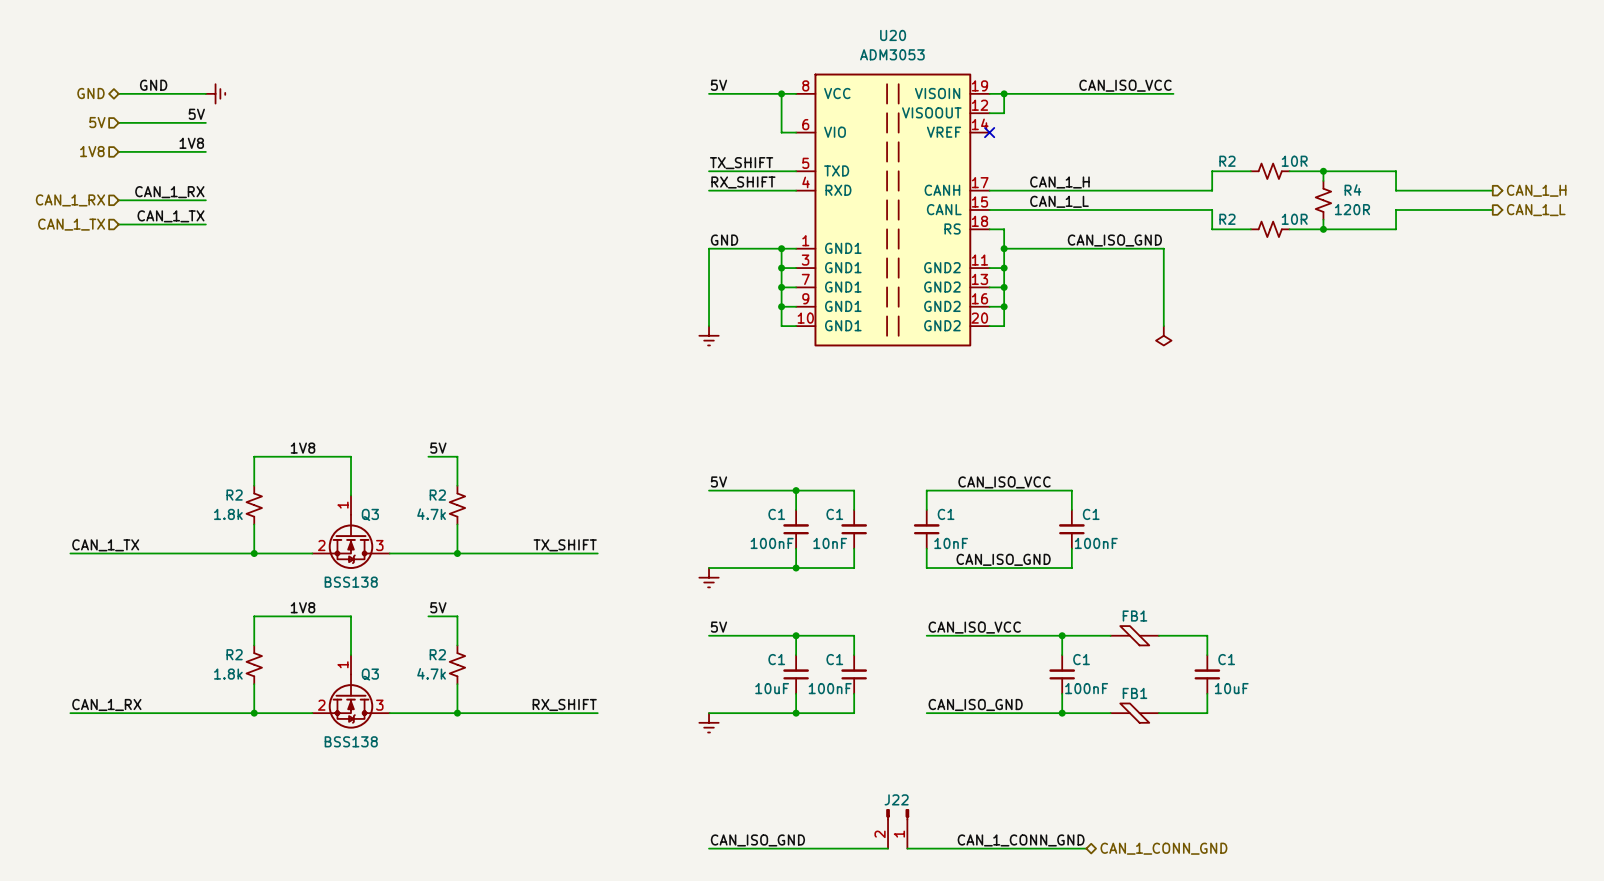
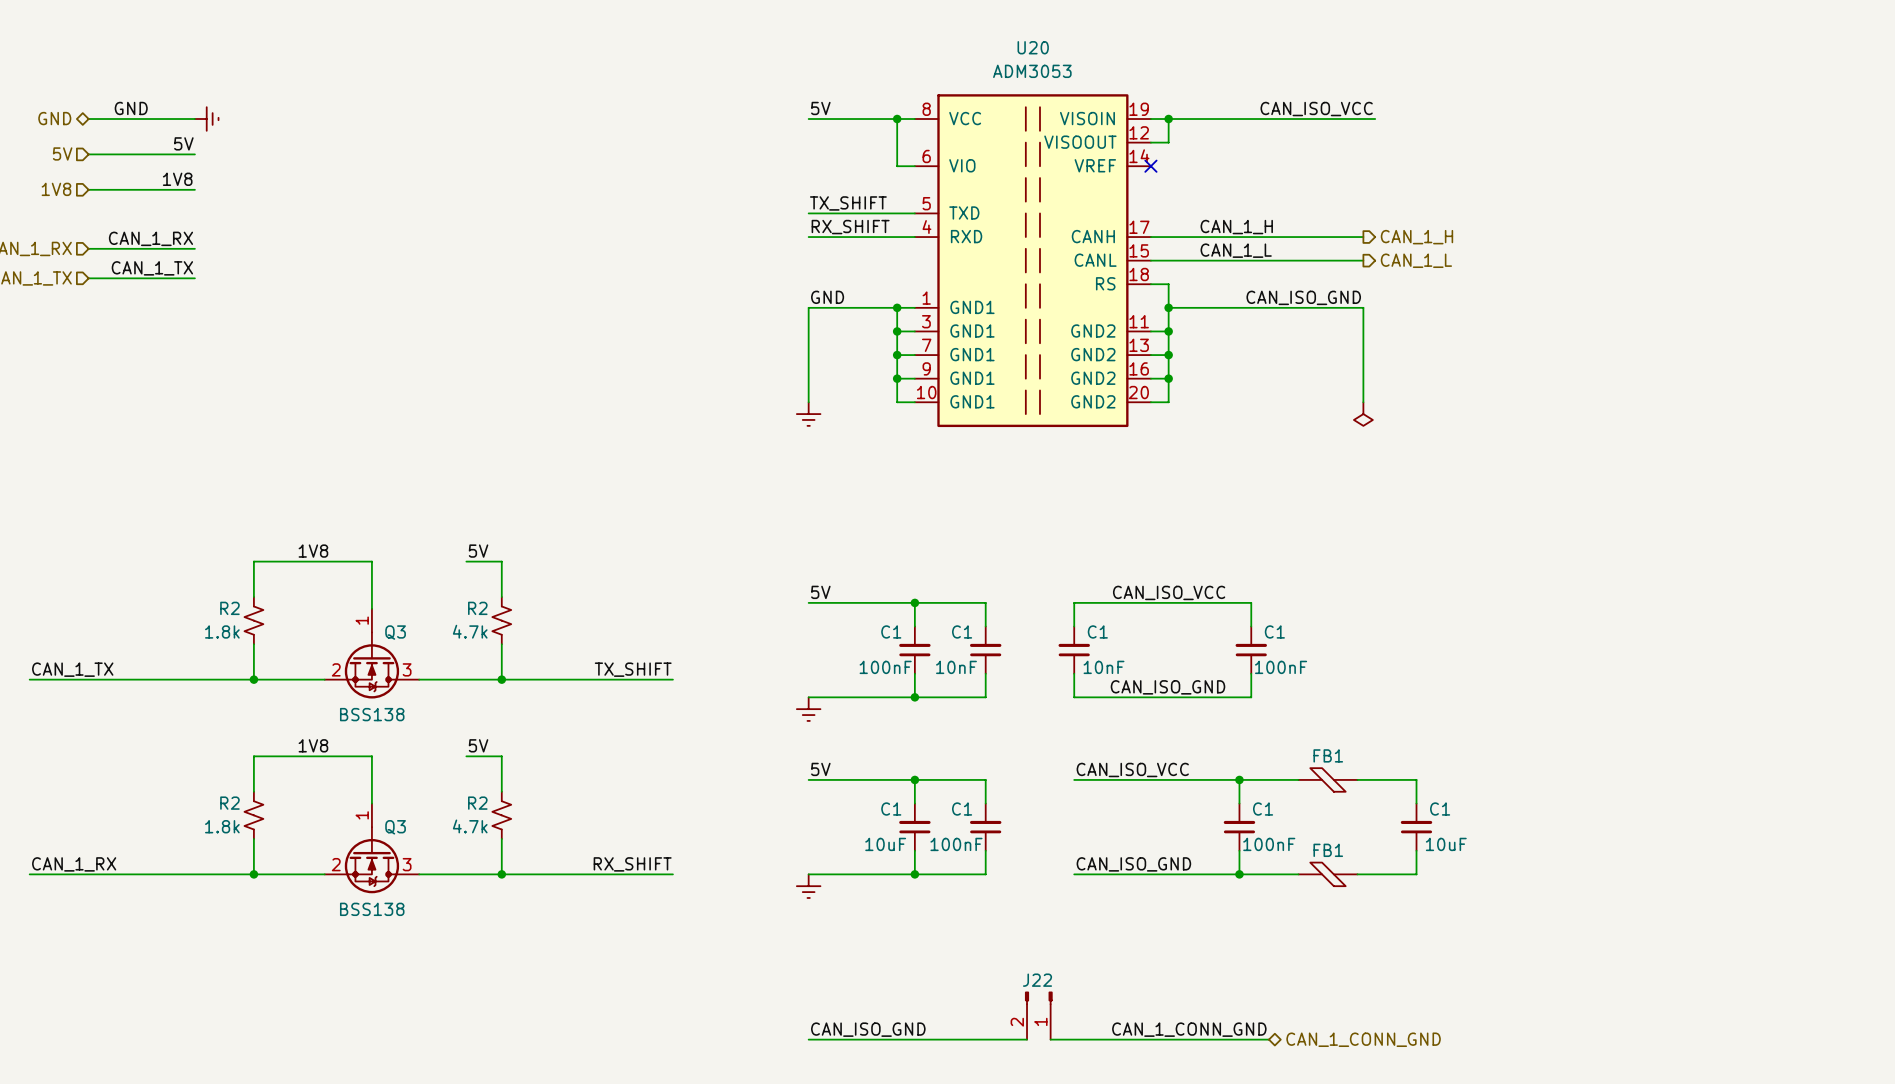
wire: (1250, 171) (1212, 171) (1212, 190) (1163, 190) -> none
R2: 10R (1270, 171) -> none
wire: (1289, 171) (1396, 171) (1396, 190) (1492, 190) -> none
wire: (1323, 171) (1323, 180) -> none
junction: (1323, 171) -> none
hierarchical label: none -> CAN_1_H (1416, 237)
hierarchical label: CAN_1_H (1536, 190) -> none
R4: 120R (1323, 200) -> none
wire: (1163, 209) (1212, 209) (1212, 229) (1250, 229) -> none
wire: (1492, 209) (1396, 209) (1396, 229) (1289, 229) -> none
hierarchical label: none -> CAN_1_L (1416, 260)
hierarchical label: CAN_1_L (1536, 210) -> none
wire: (1323, 219) (1323, 229) -> none
R2: 10R (1270, 229) -> none
junction: (1323, 229) -> none

